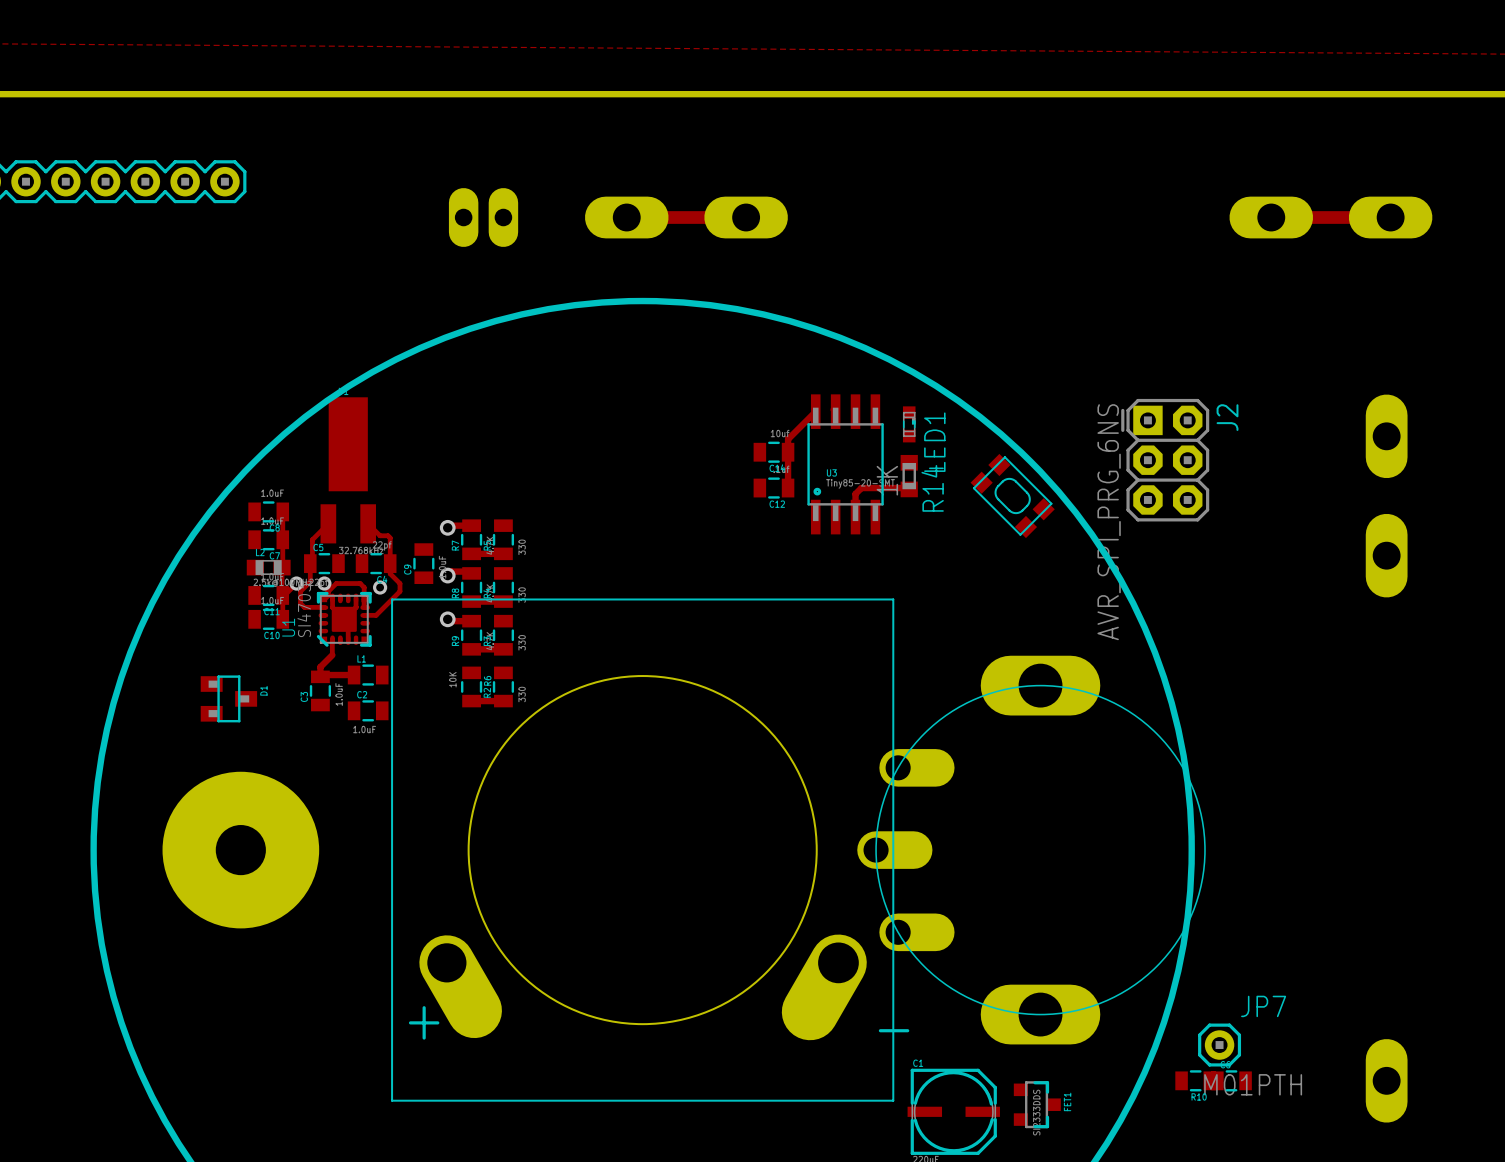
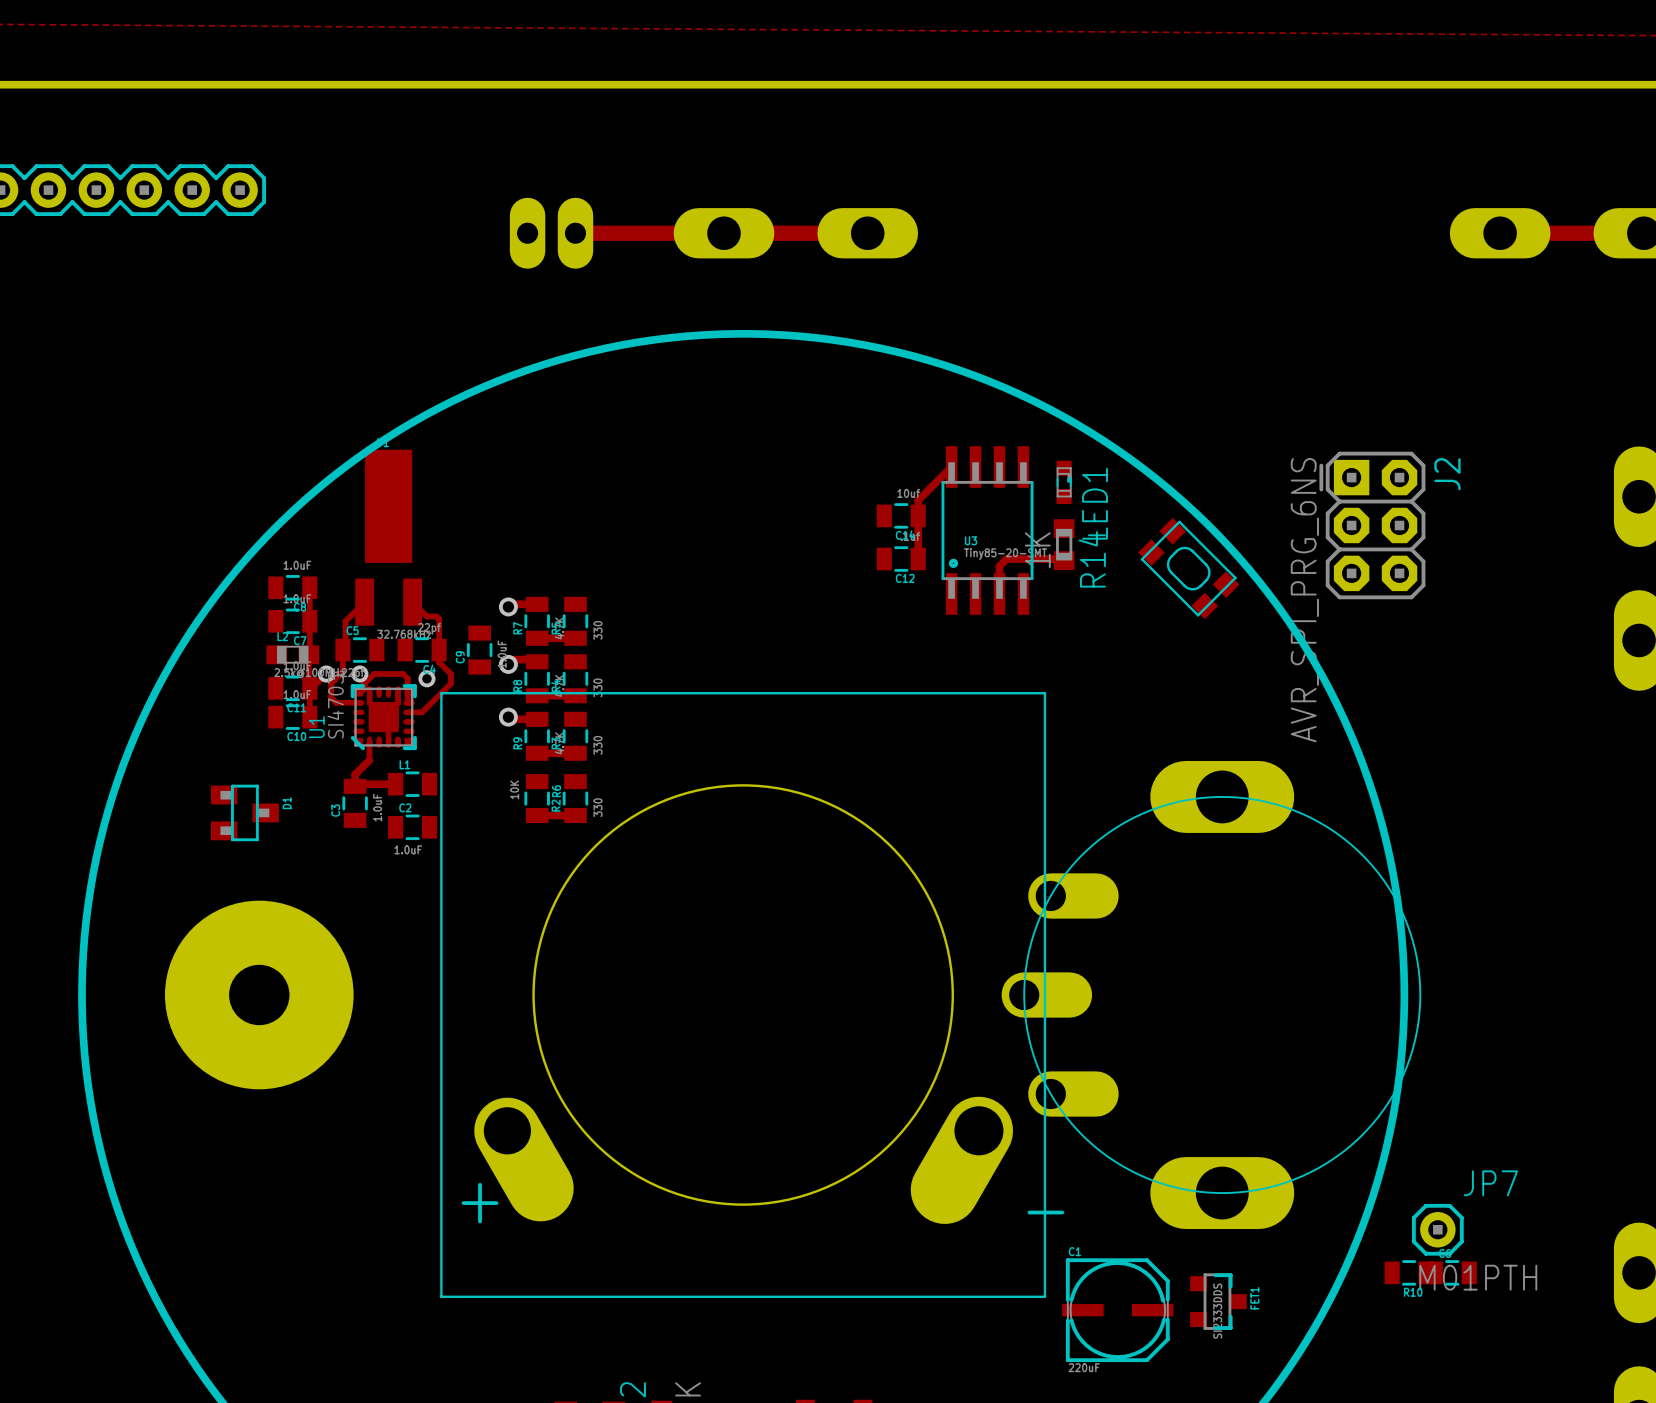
track: none -> (575, 233) (724, 233)

